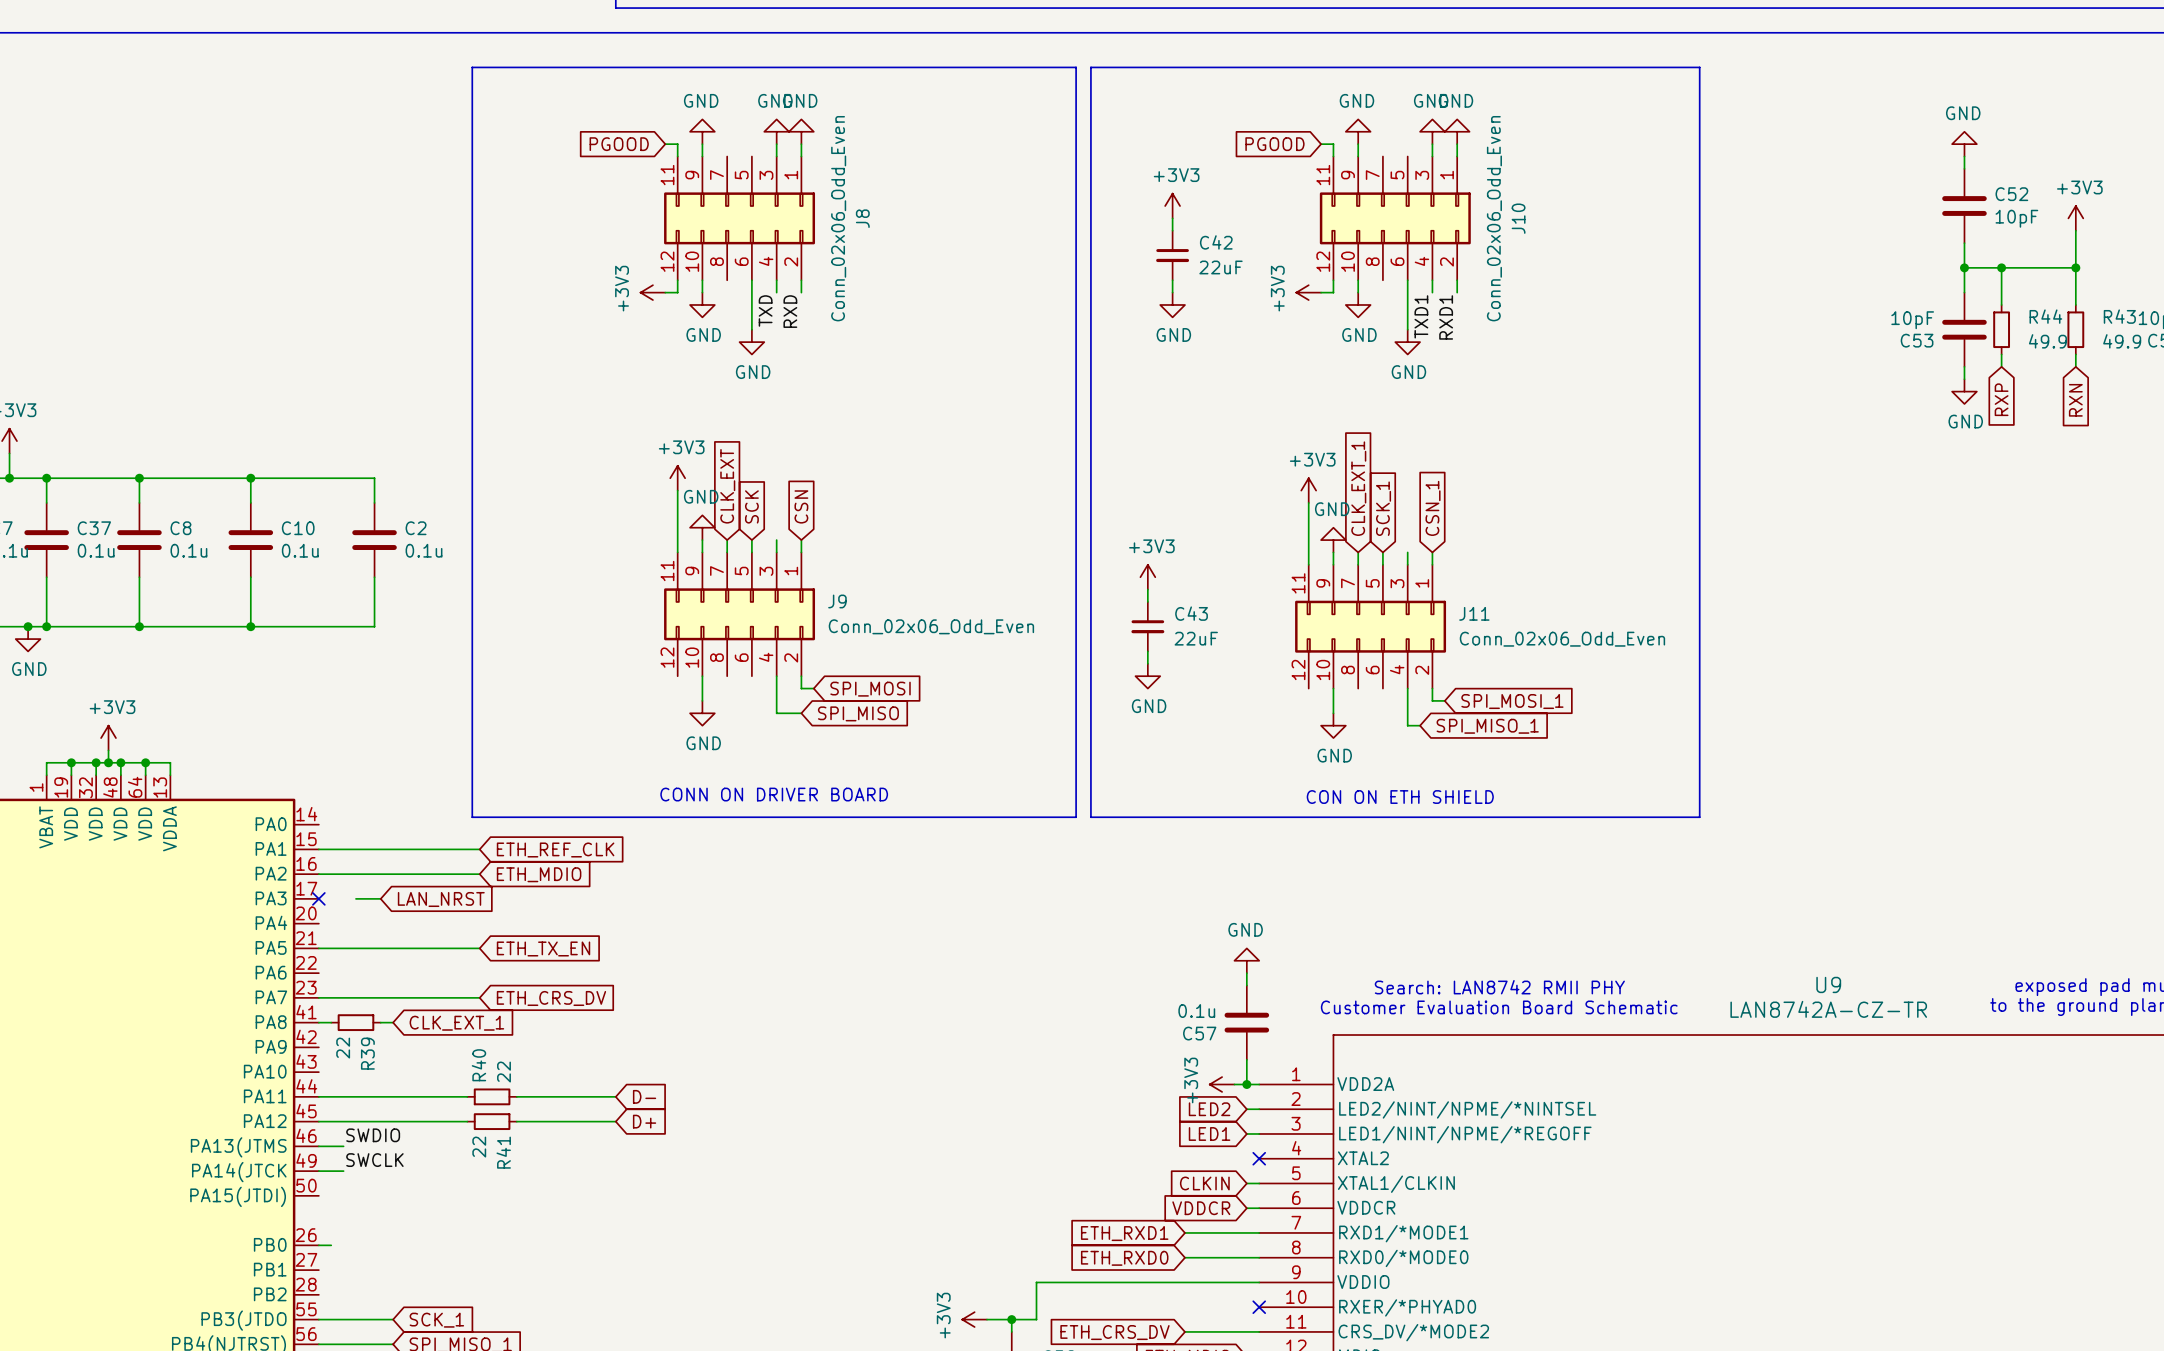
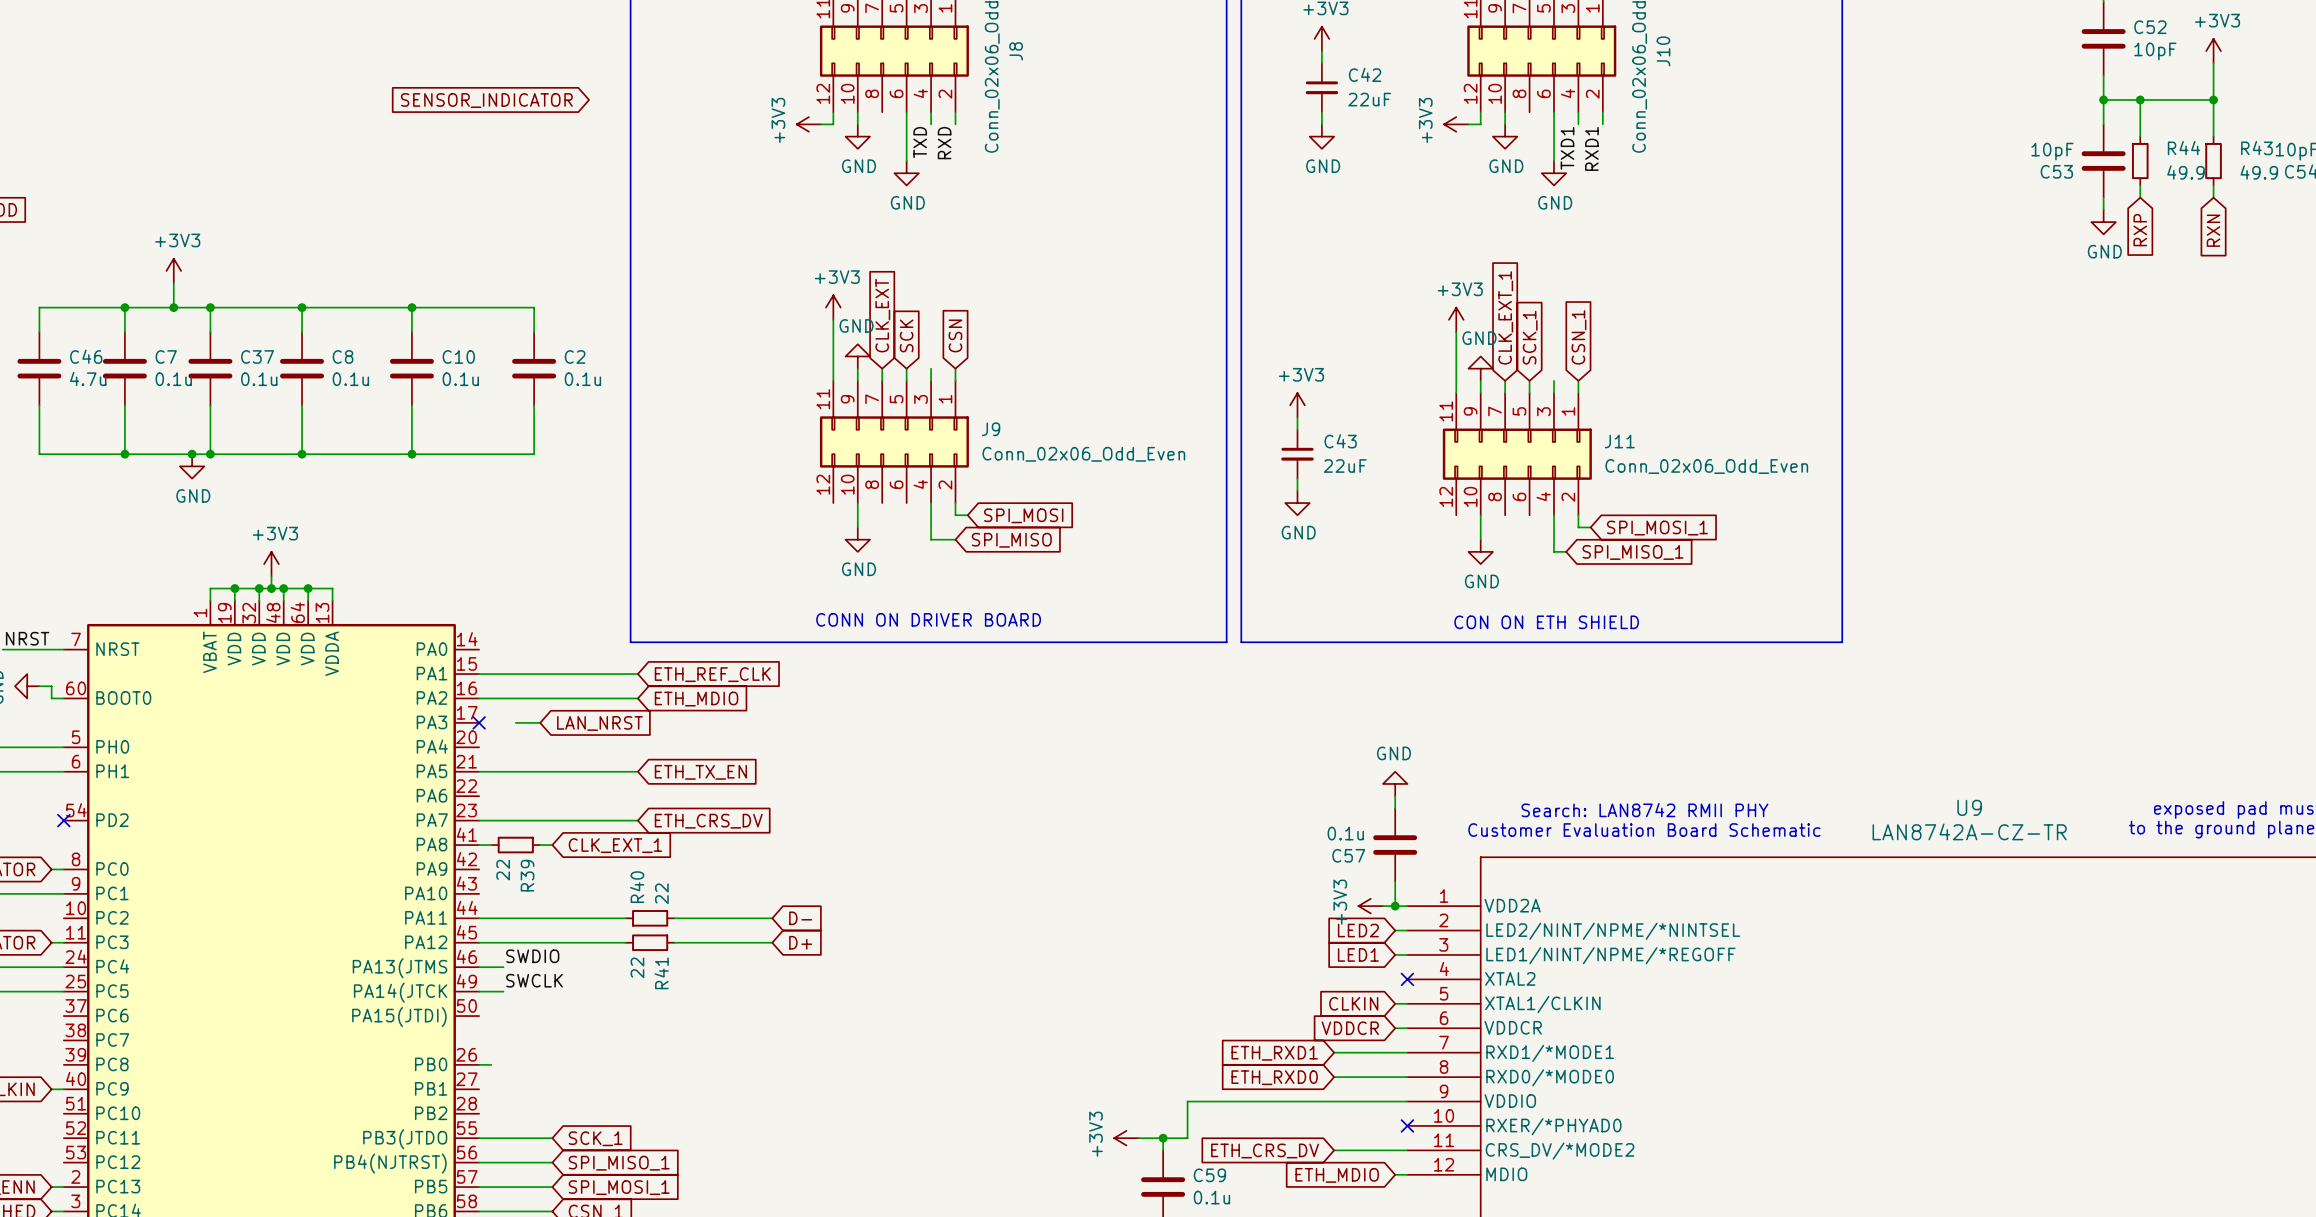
global label: none -> SENSOR_INDICATOR (486, 100)

